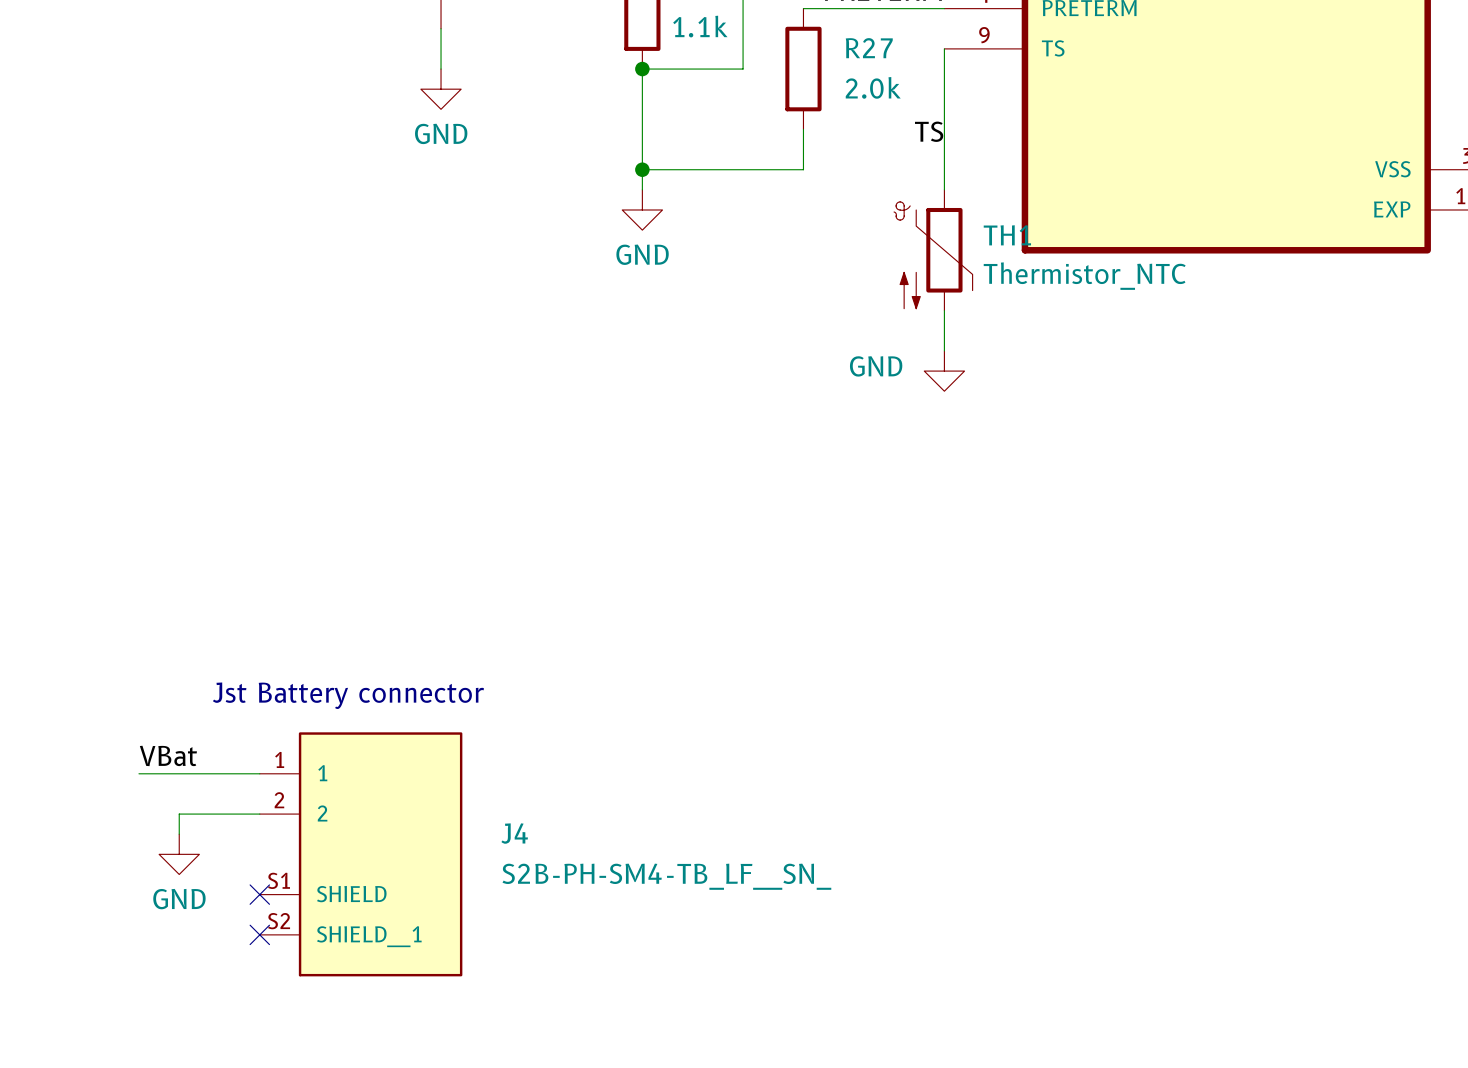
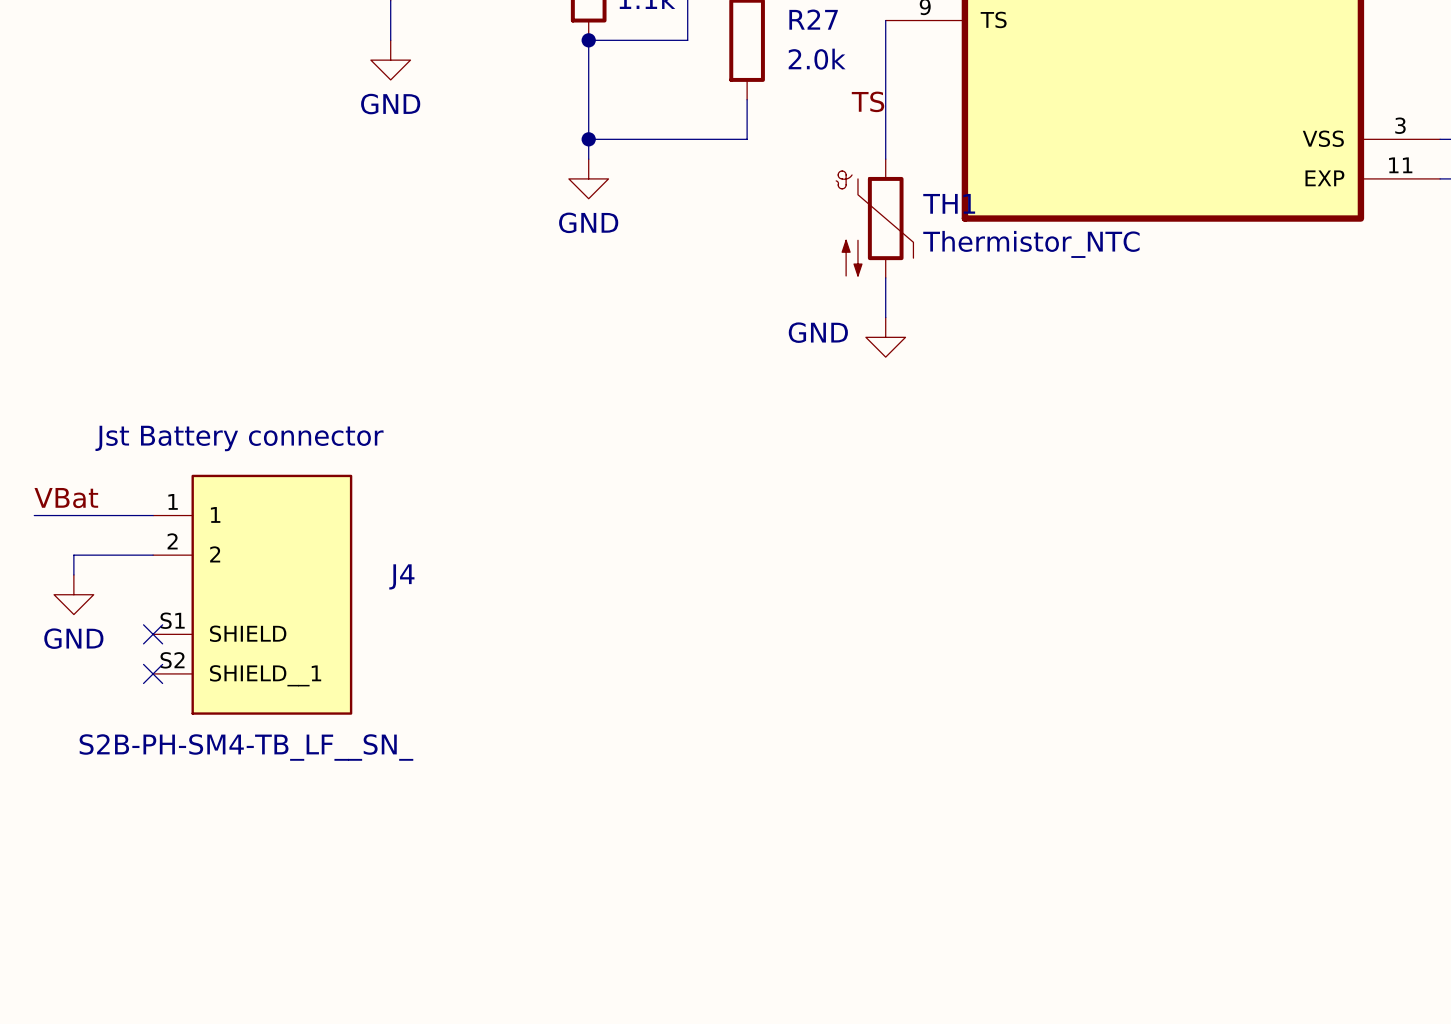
no-connect mark: none -> (153, 634)
text position: Jst Battery connector (348, 695) -> Jst Battery connector (239, 438)
no-connect mark: none -> (153, 673)
label position: VBat (168, 755) -> VBat (66, 498)
wire: (138, 773) (259, 773) -> (34, 515) (153, 515)
wire: (259, 814) (179, 814) (179, 834) -> (153, 555) (73, 555) (73, 574)
power symbol position: GND (179, 854) -> GND (73, 594)
J4 position: (361, 854) -> (252, 594)
J4 value position: S2B-PH-SM4-TB_LF__SN_ (666, 876) -> S2B-PH-SM4-TB_LF__SN_ (246, 747)
no-connect mark: (259, 894) -> none
no-connect mark: (259, 934) -> none

